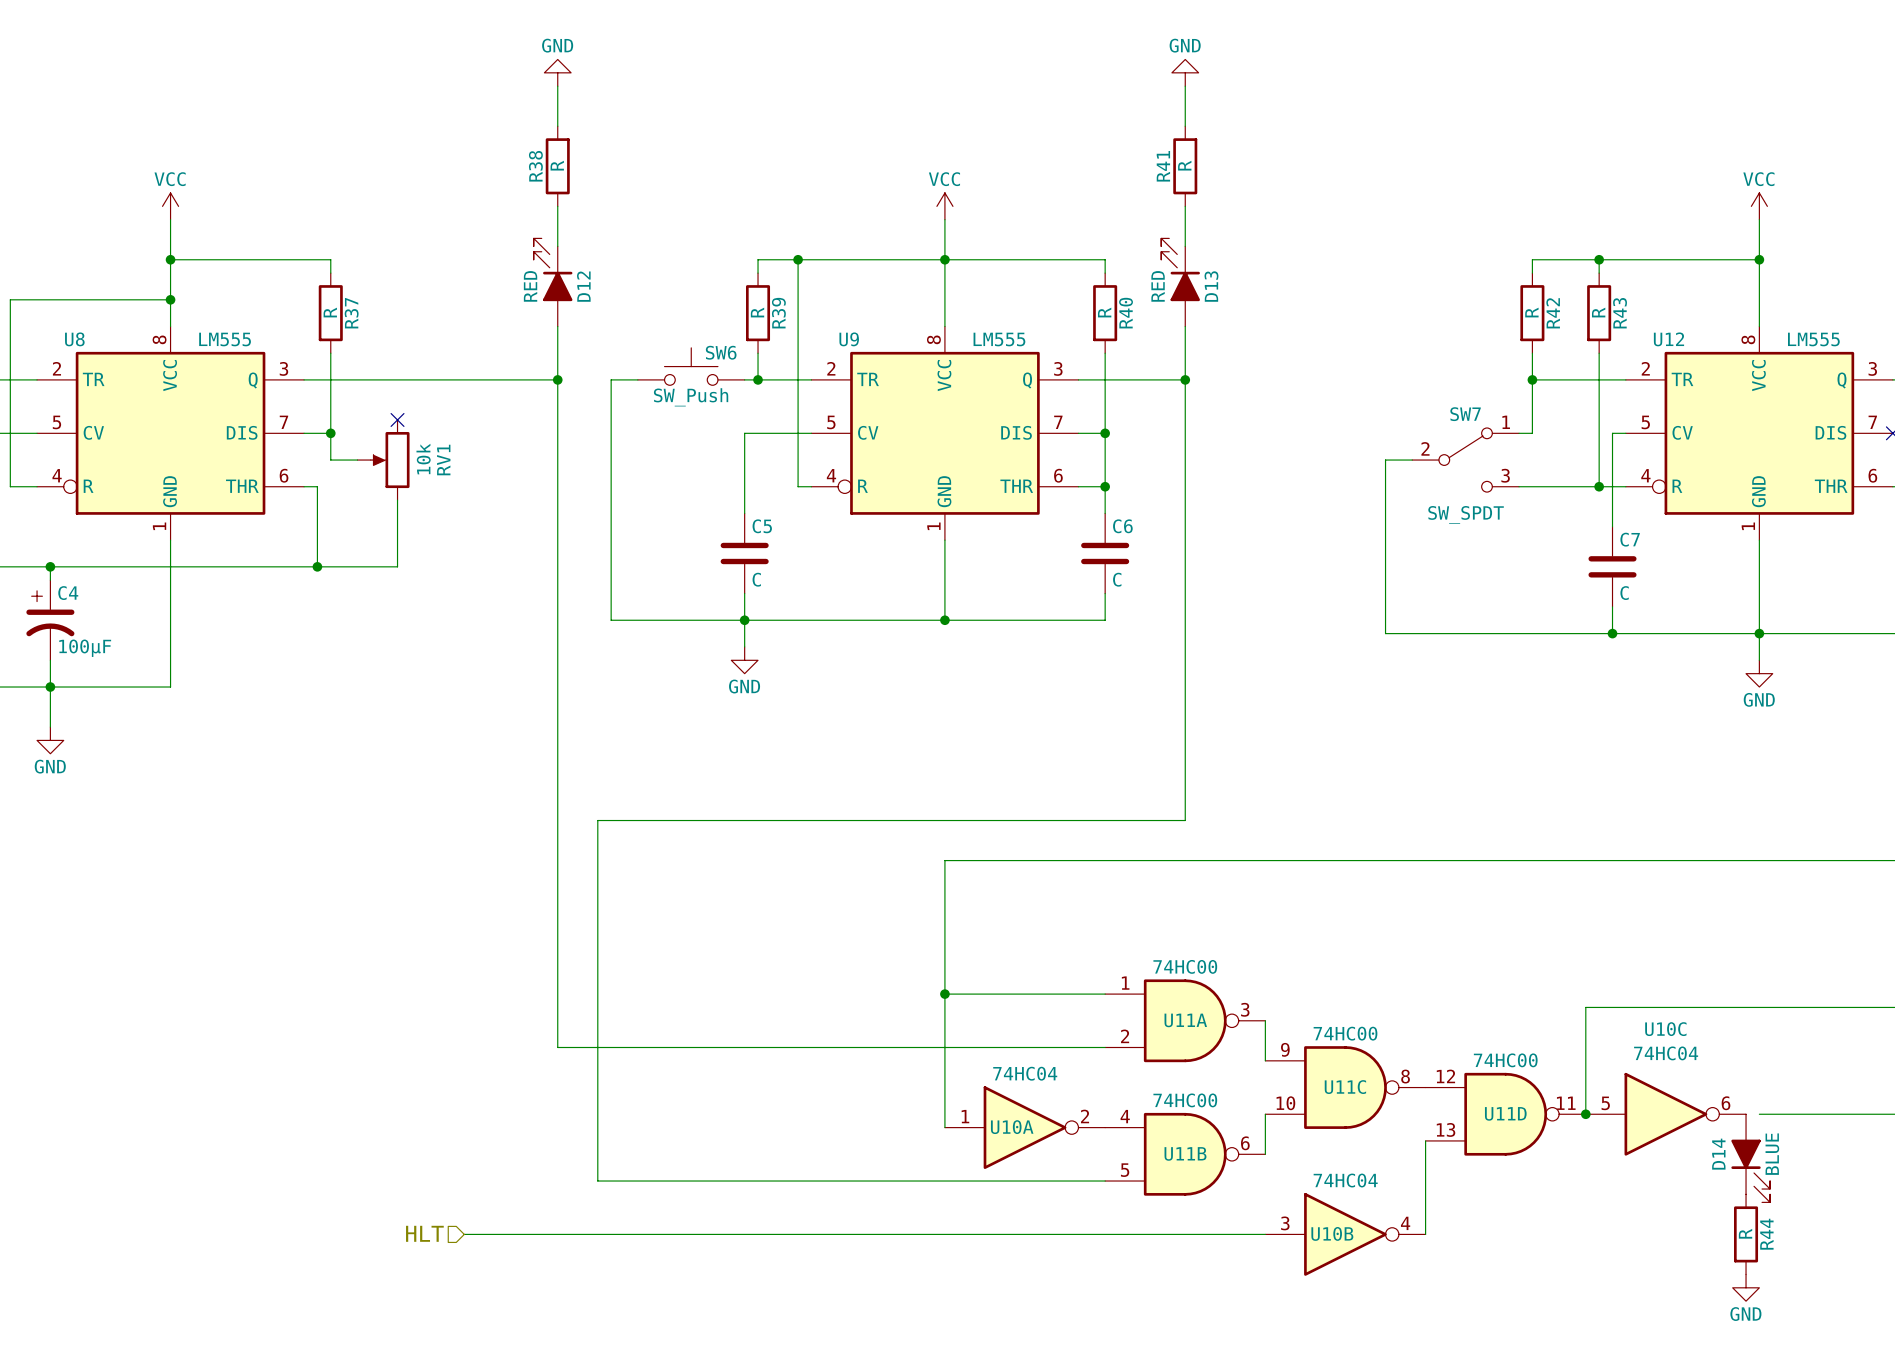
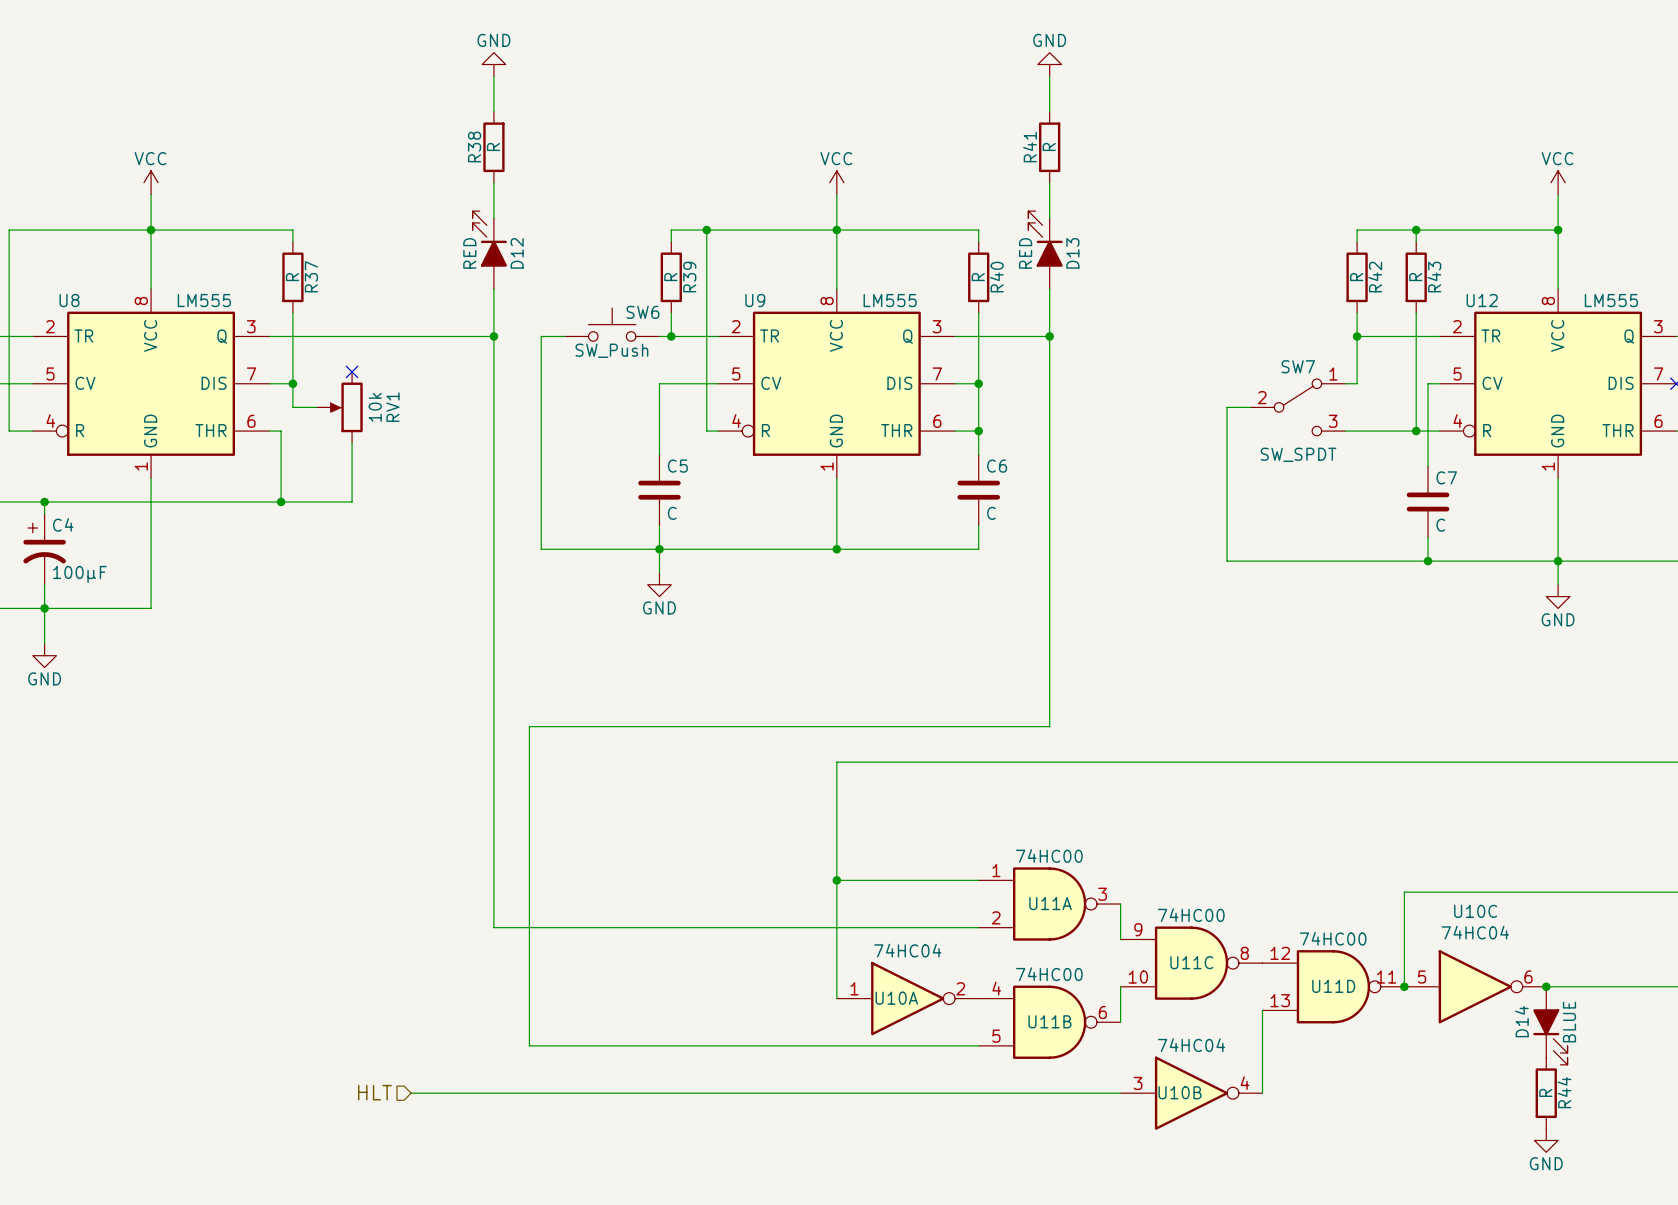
wire: (10, 299) (170, 299) -> (9, 265) (9, 230) (151, 230)
junction: (170, 299) -> none
wire: none -> (1546, 986) (1558, 986)
junction: none -> (1546, 986)

